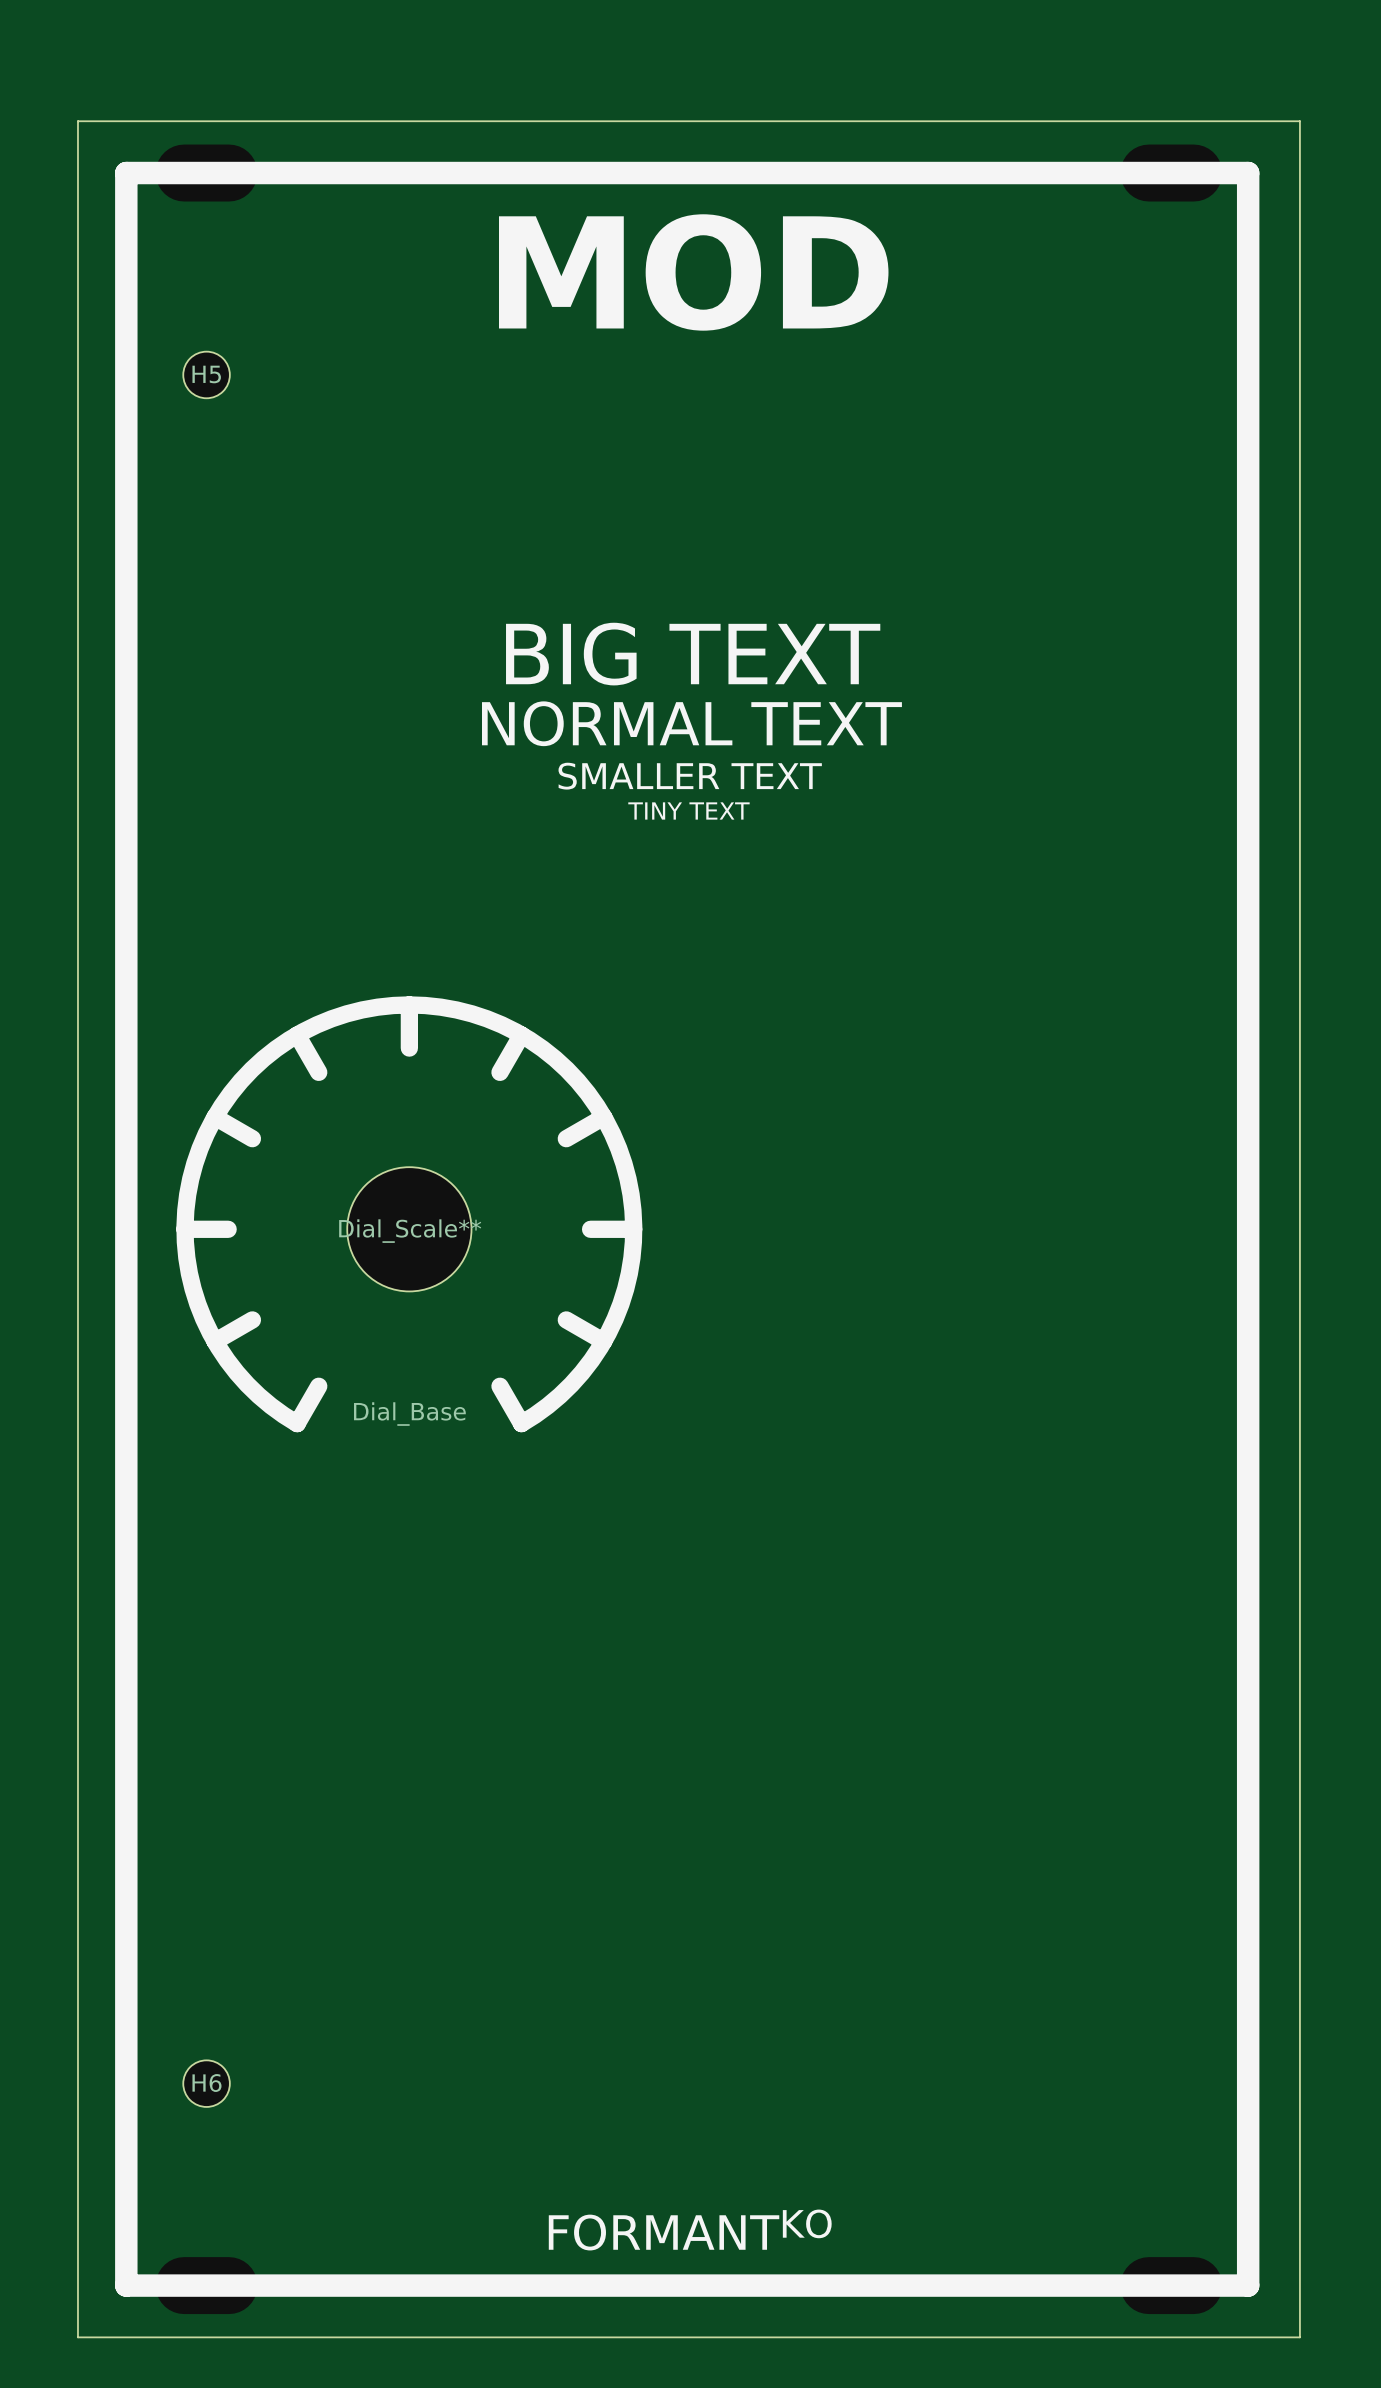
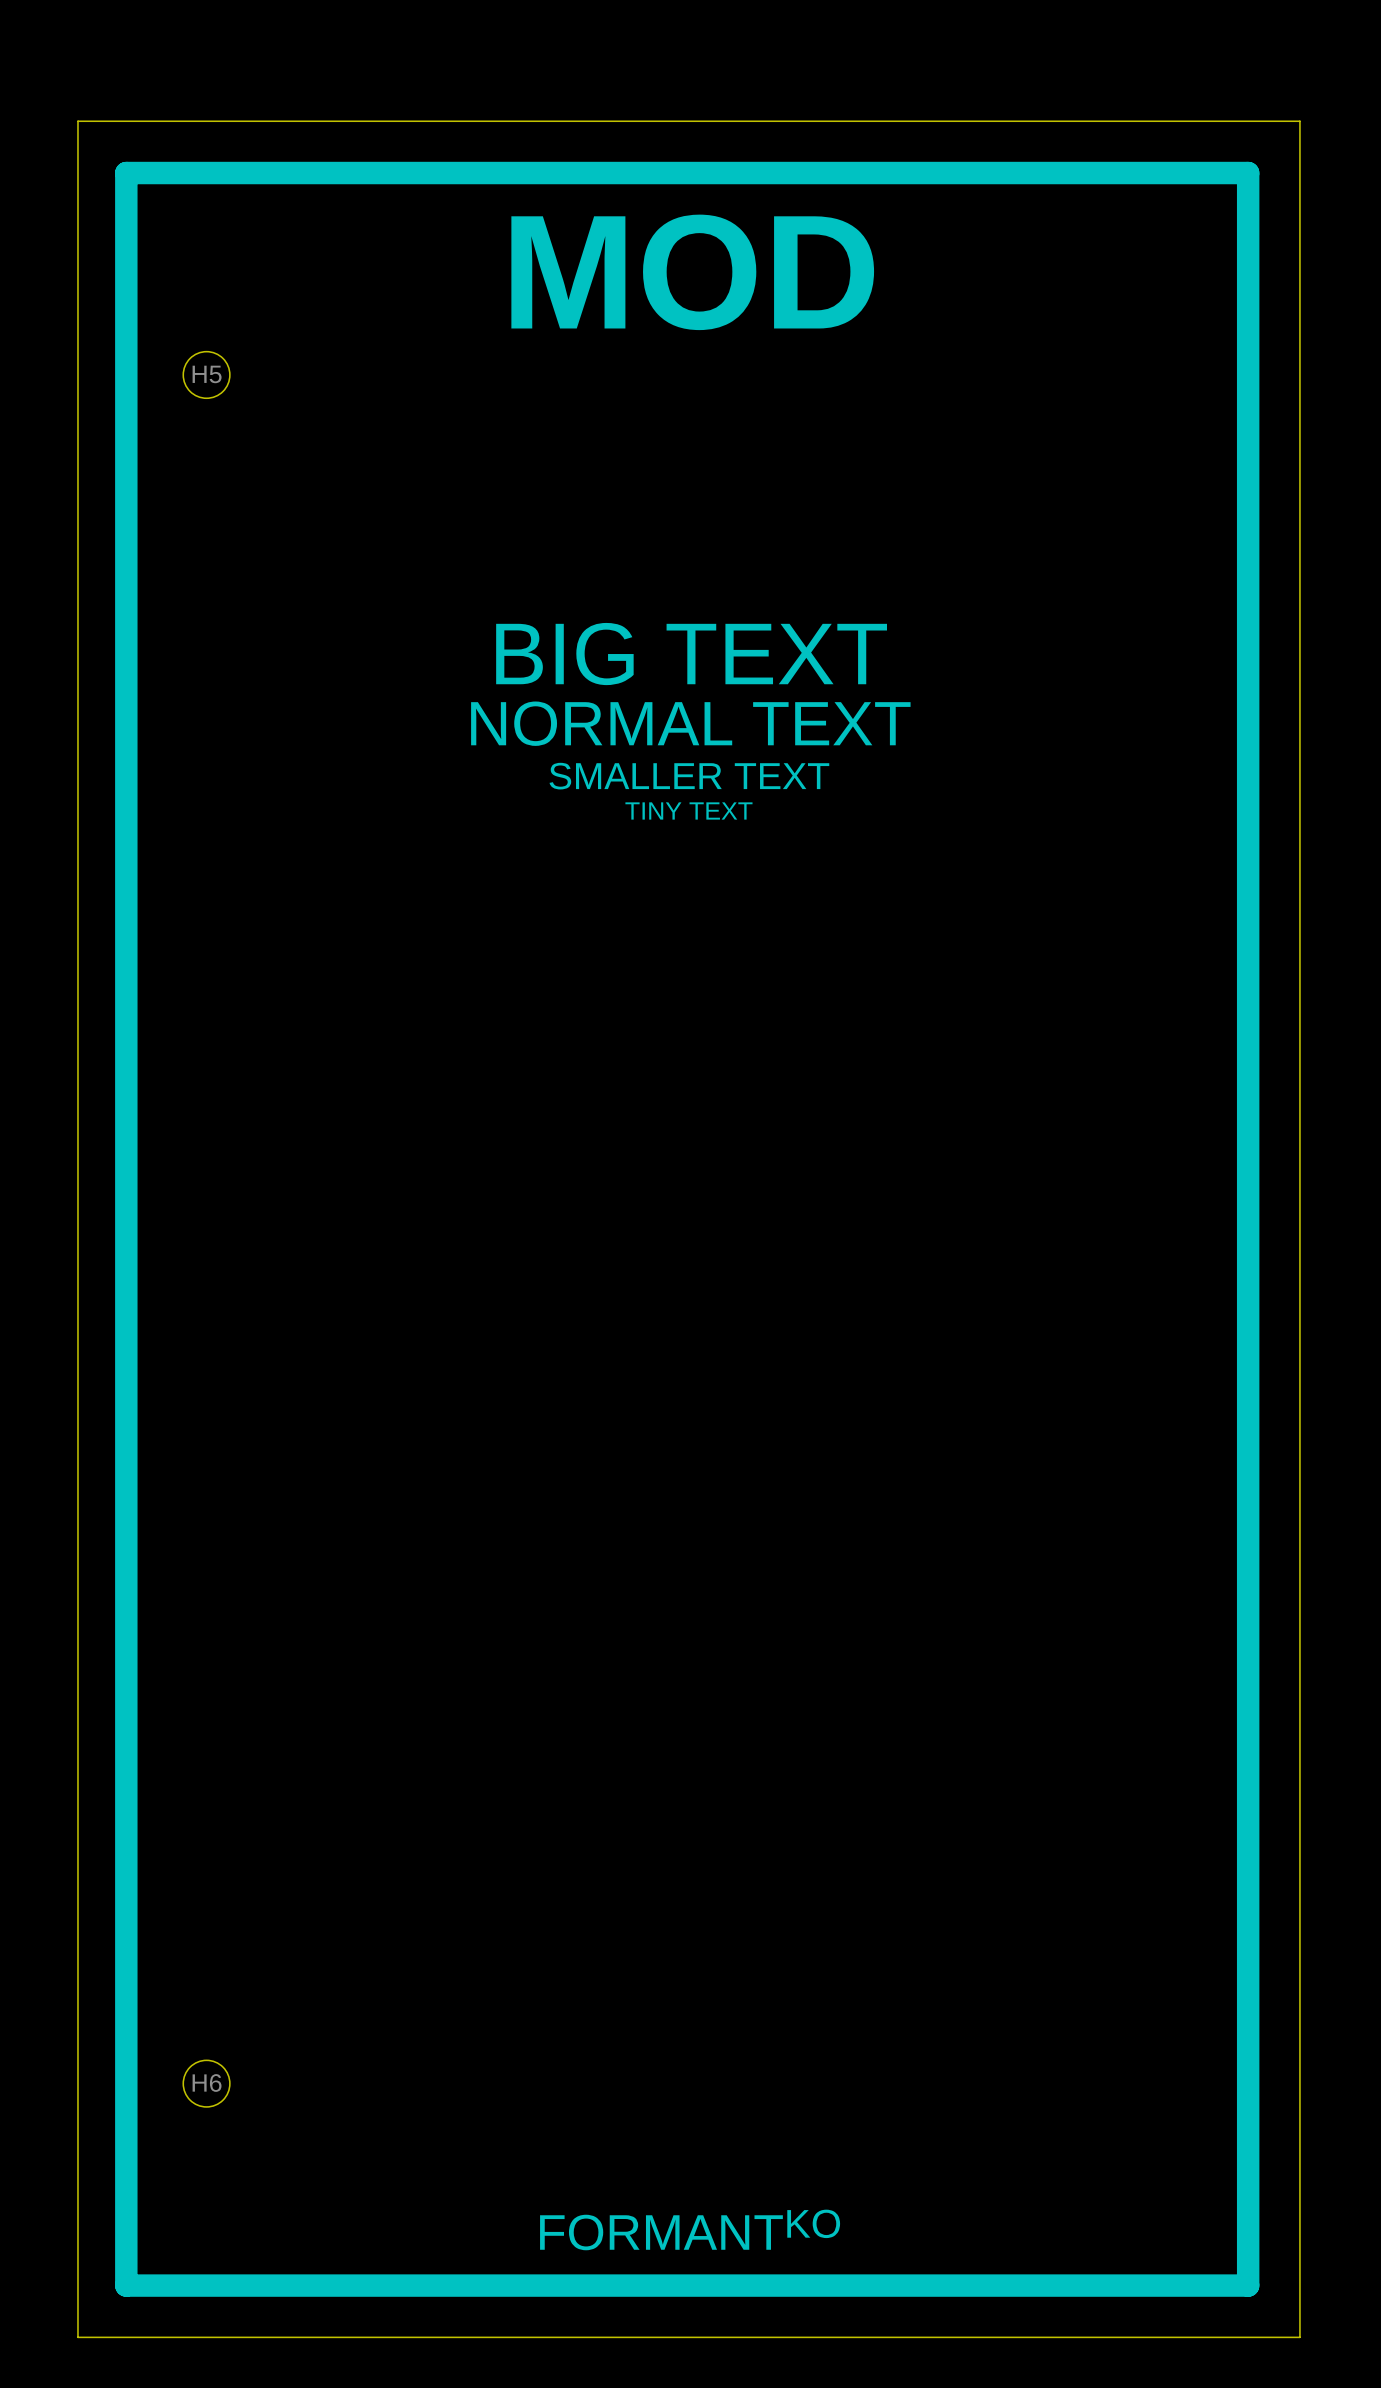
Dial_Scale**: Dial_Base (409, 1214) -> none

